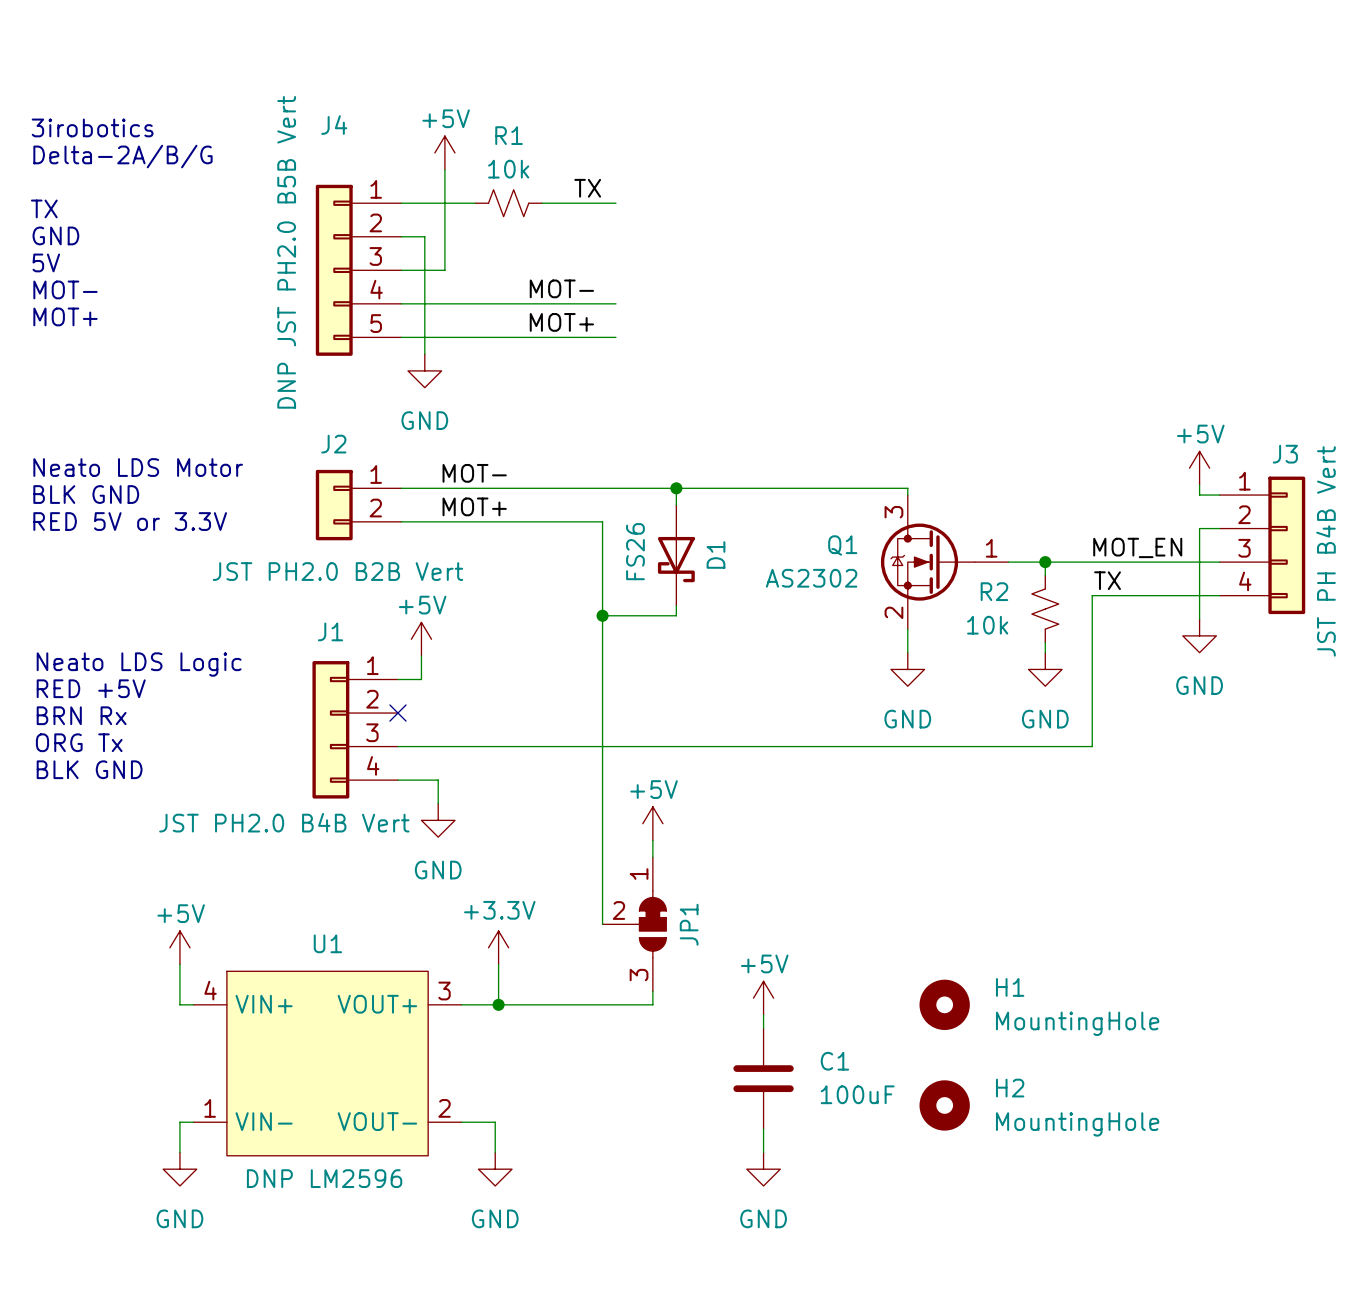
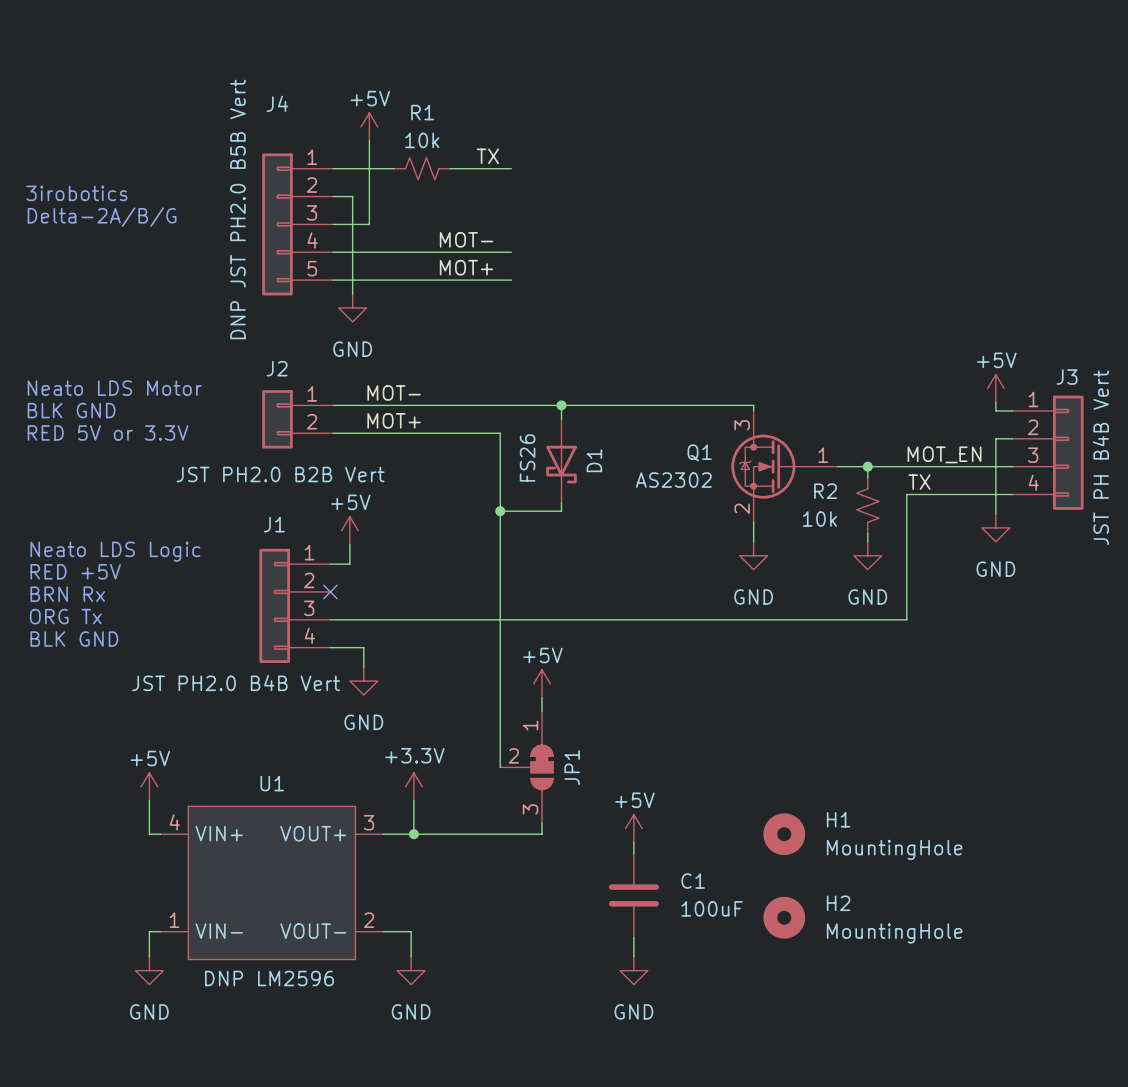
text: 3irobotics (92, 127) -> none
text: Delta-2A/B/G (122, 156) -> none
text: TX (44, 208) -> none
text: GND (55, 235) -> 3irobotics (76, 193)
text: 5V (46, 262) -> Delta-2A/B/G (102, 217)
text: MOT- (65, 289) -> none
text: MOT+ (65, 316) -> none

